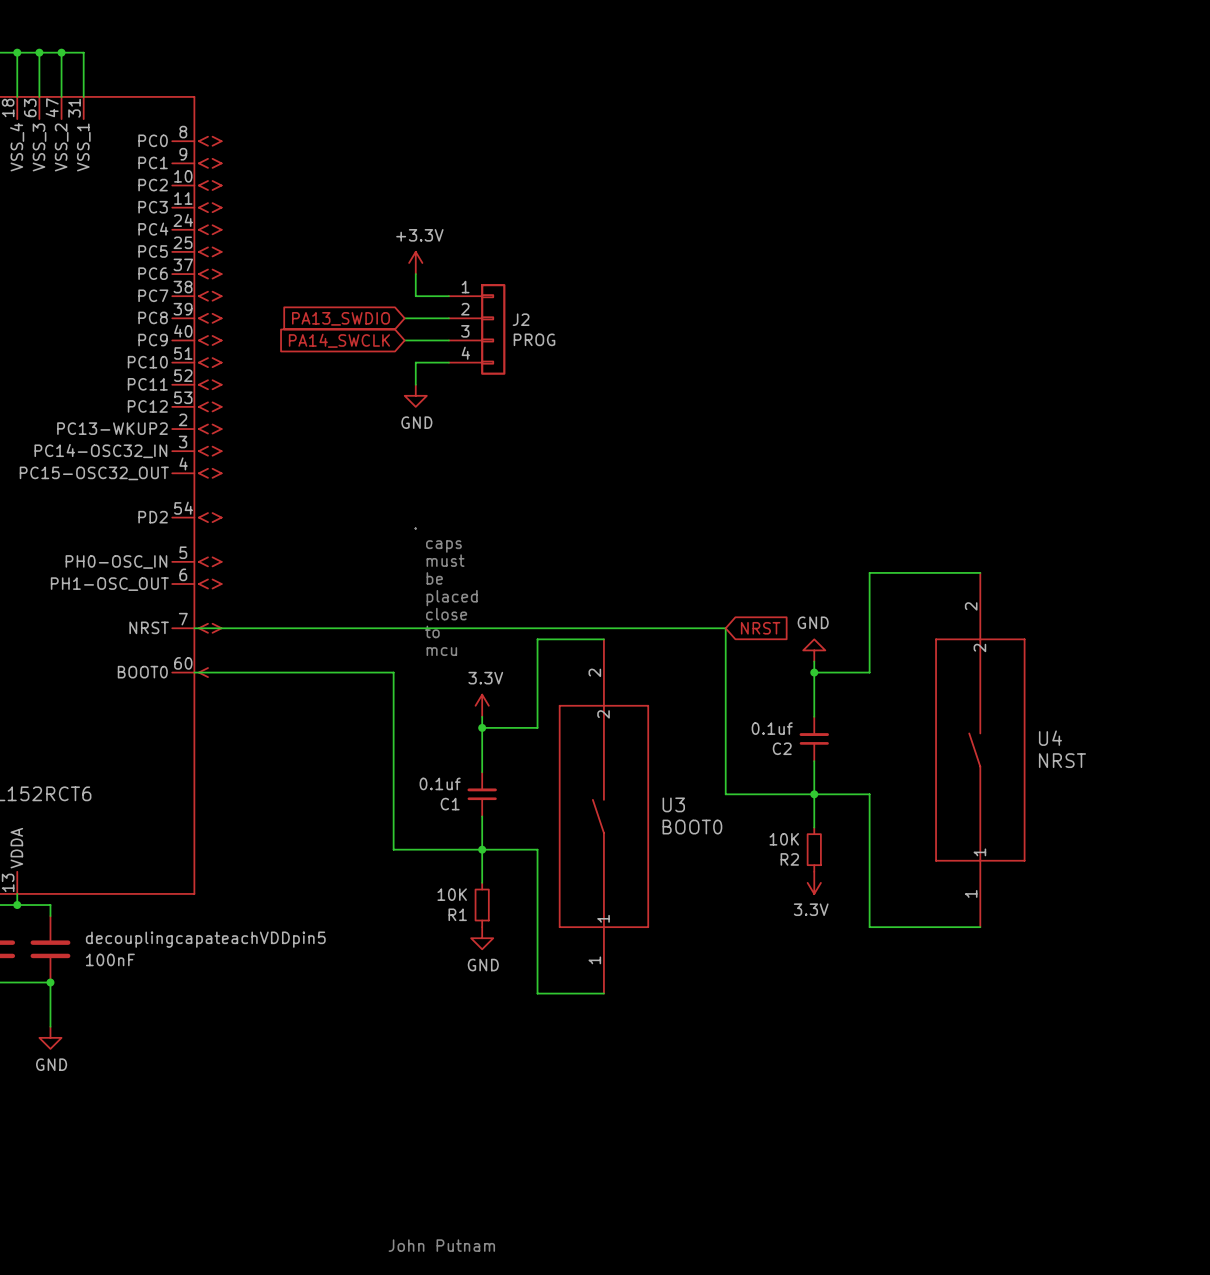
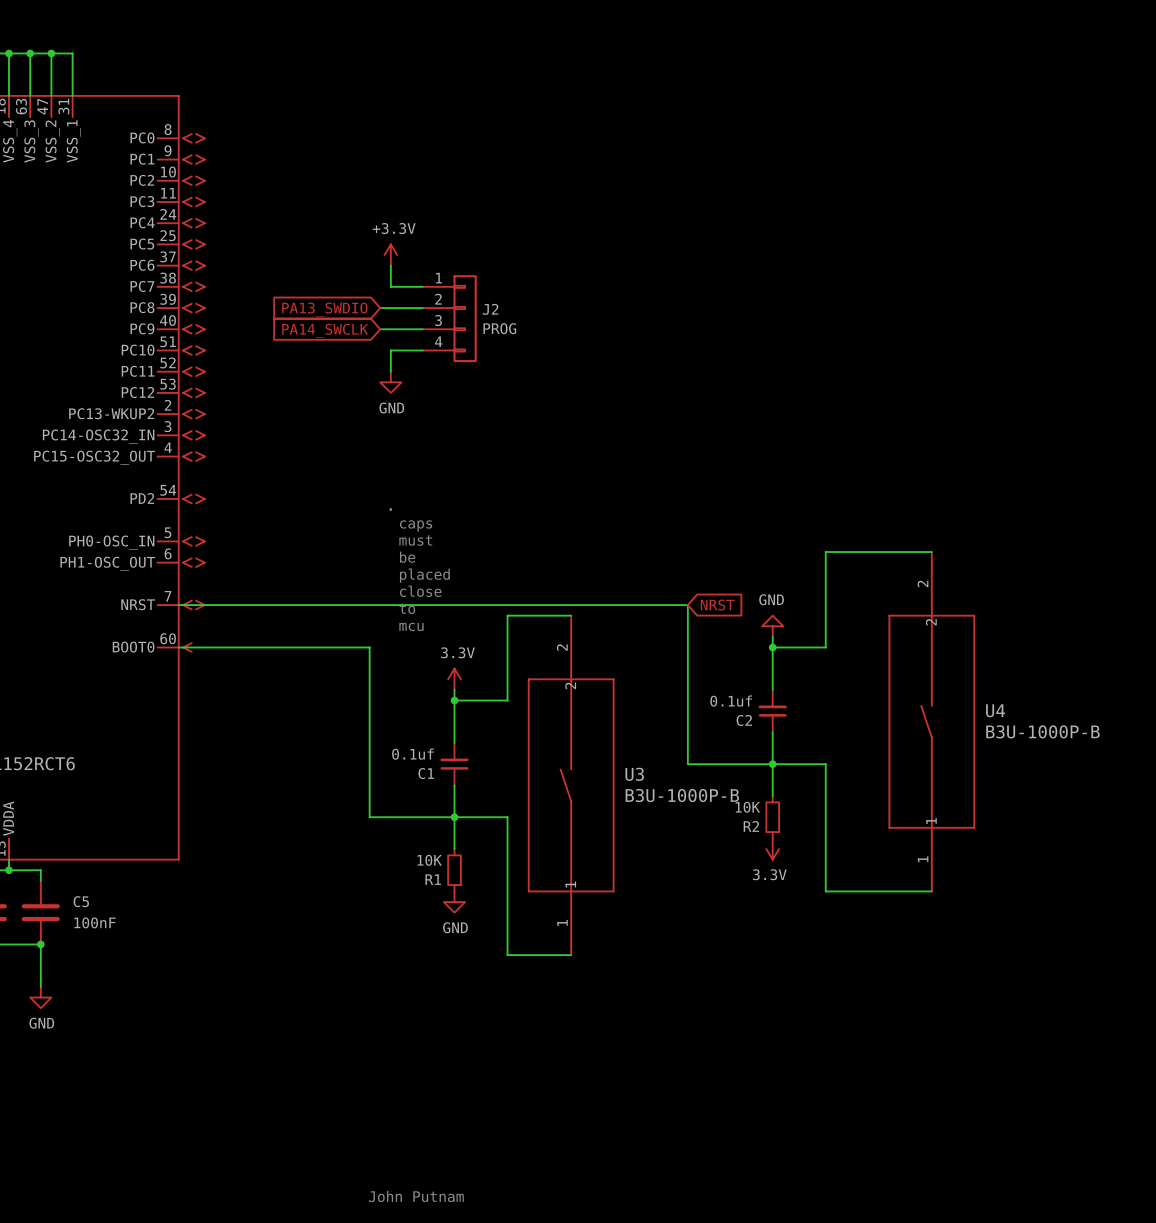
U4 value: NRST (1062, 760) -> B3U-1000P-B (1042, 731)
U3 value: BOOT0 (692, 827) -> B3U-1000P-B (682, 795)
decouplingcapateachVDDpin5 name: decouplingcapateachVDDpin5 (205, 939) -> C5 (81, 901)

